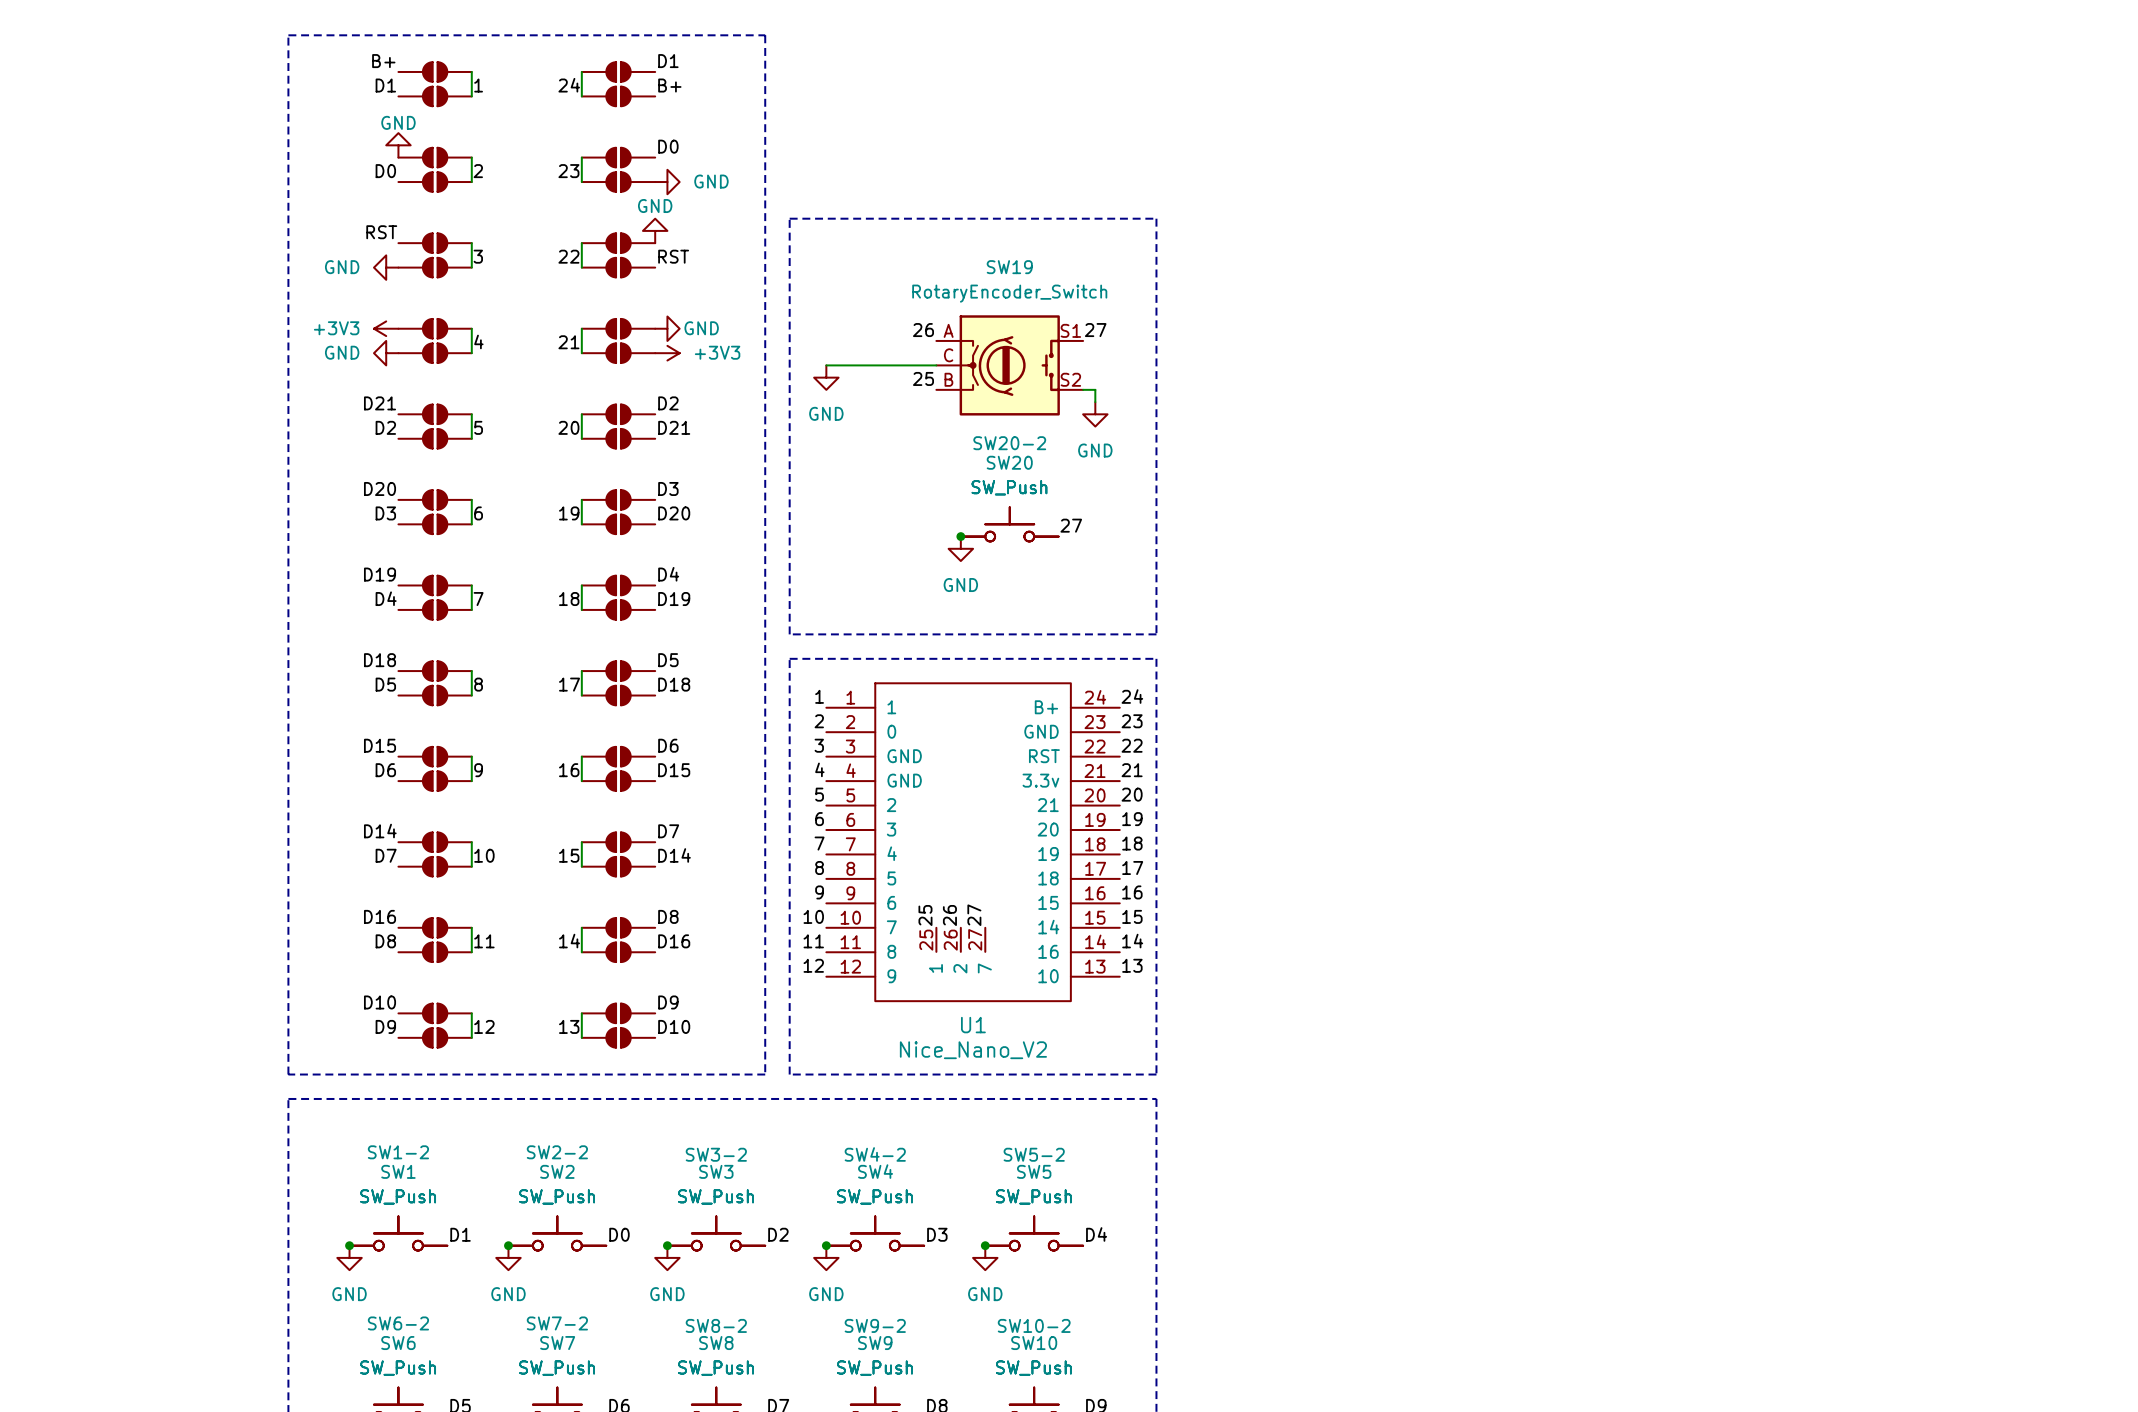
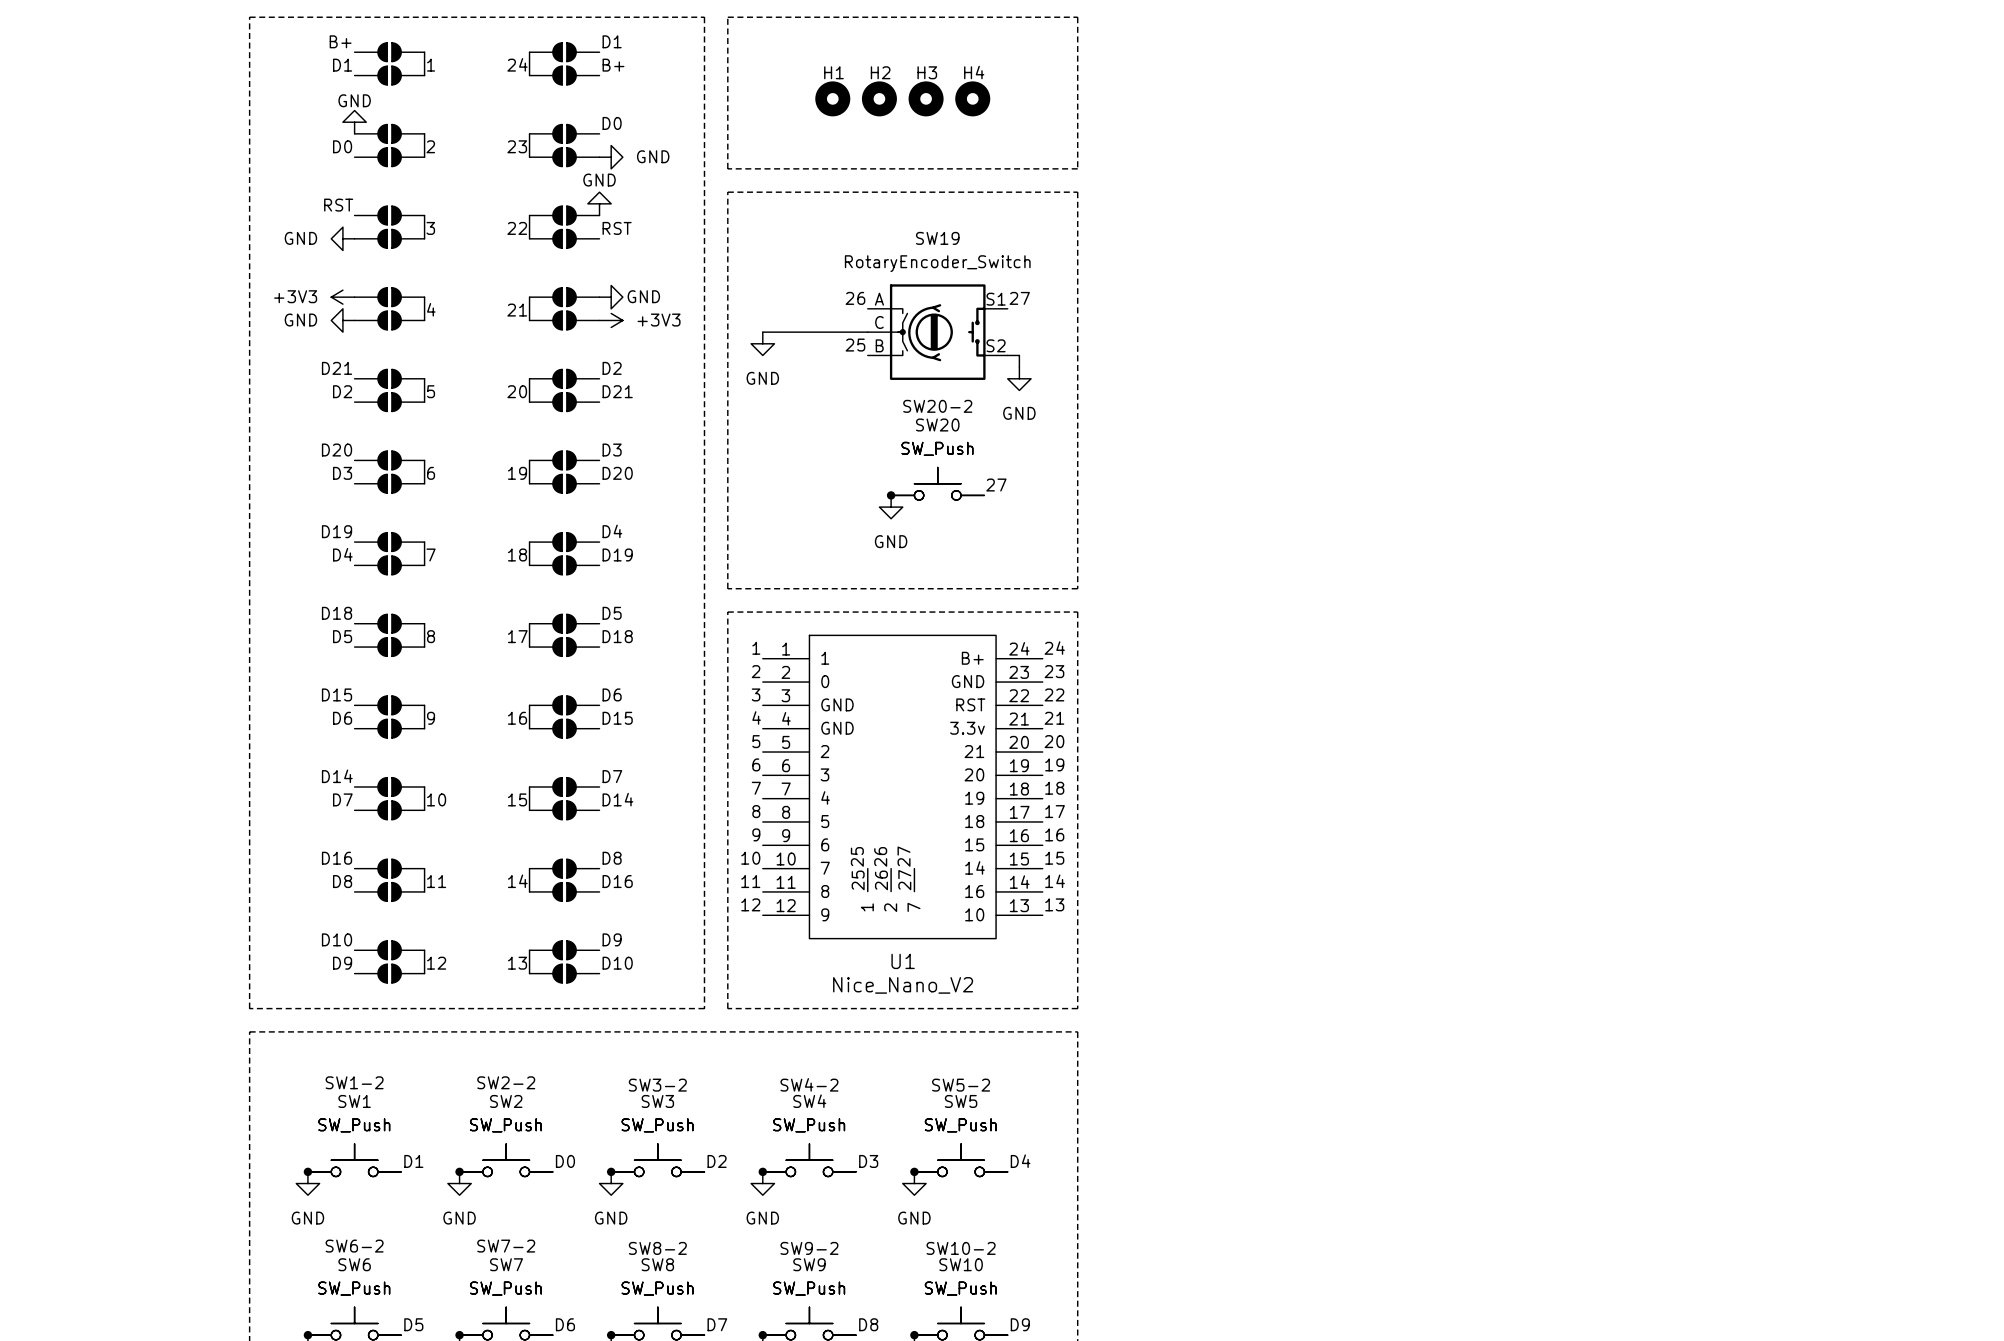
line: none -> (727, 17) (1077, 17) (1077, 168) (727, 168) (727, 17)
H1: none -> (832, 98)
H2: none -> (879, 98)
H3: none -> (926, 98)
H4: none -> (972, 98)

